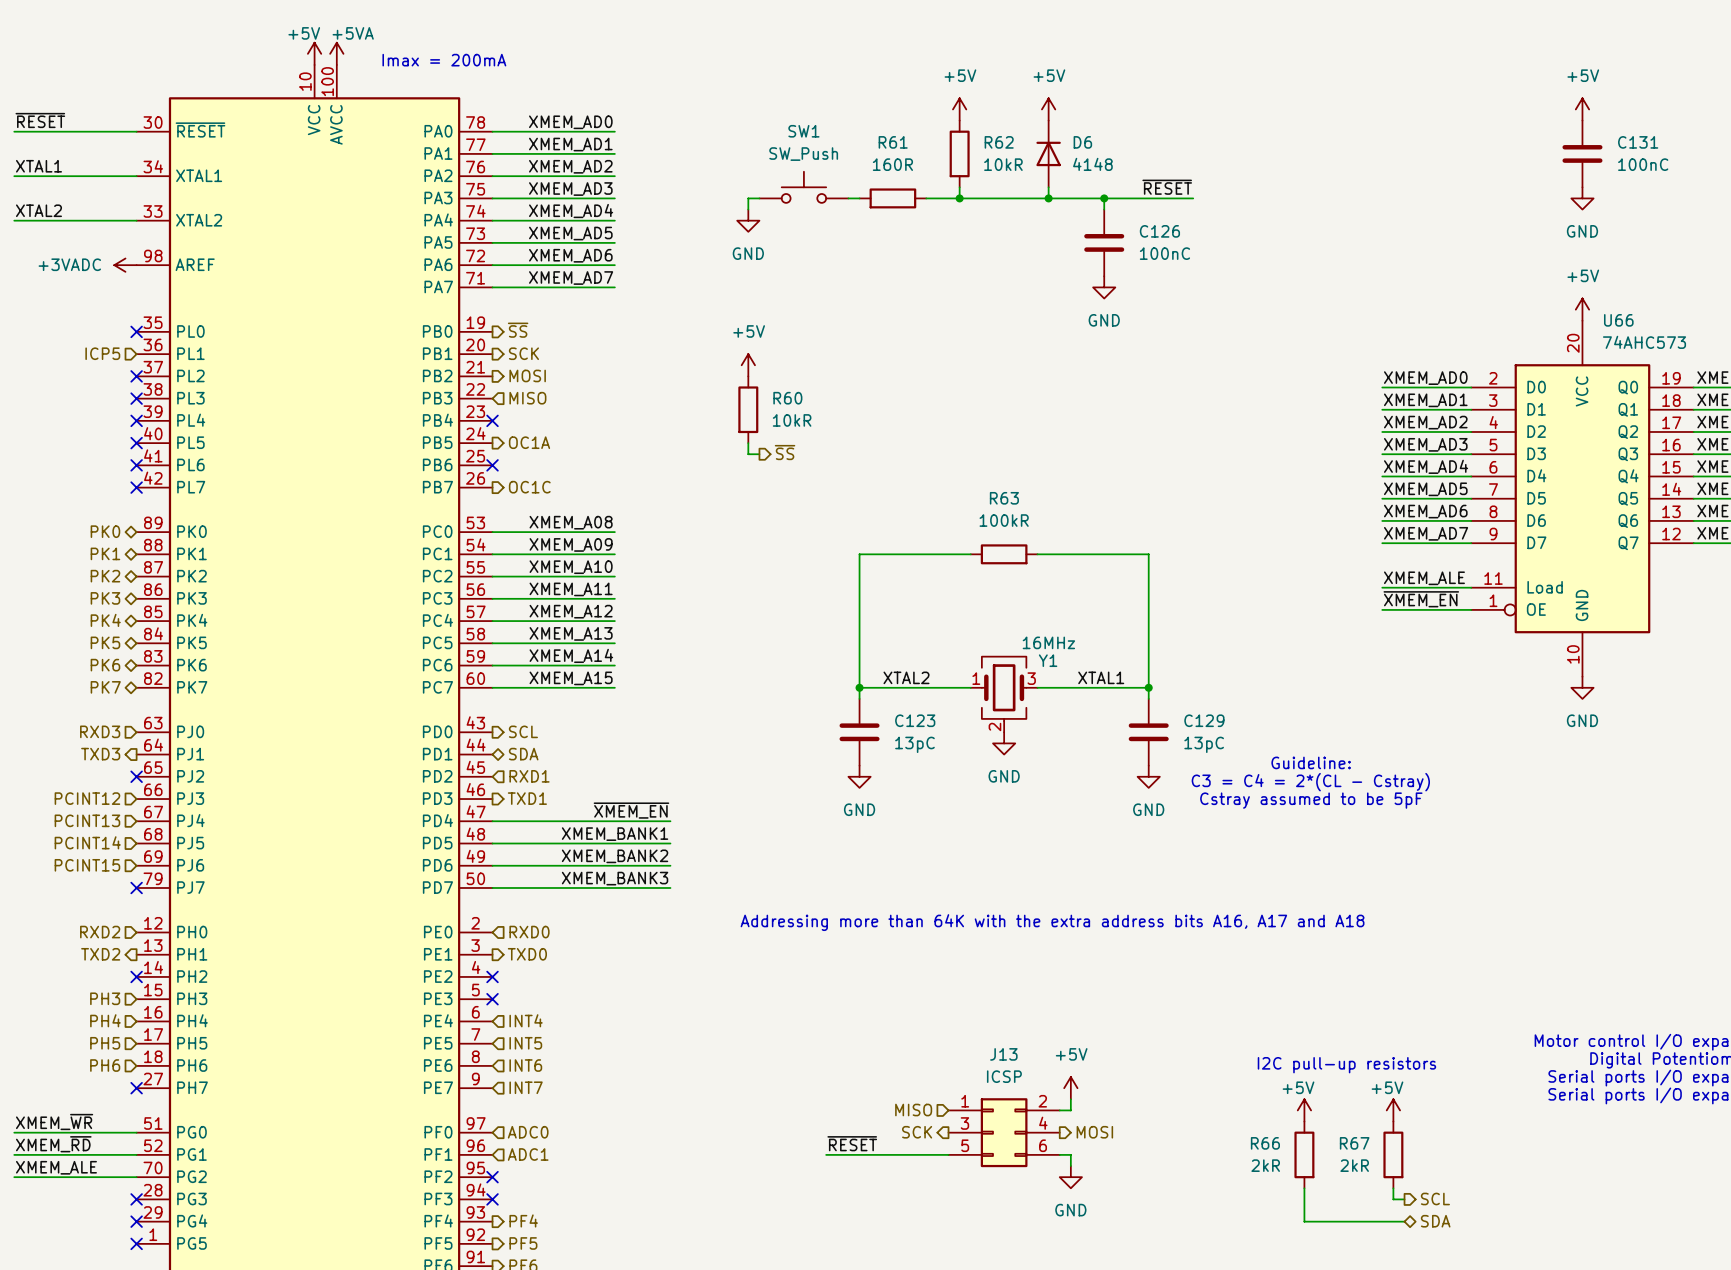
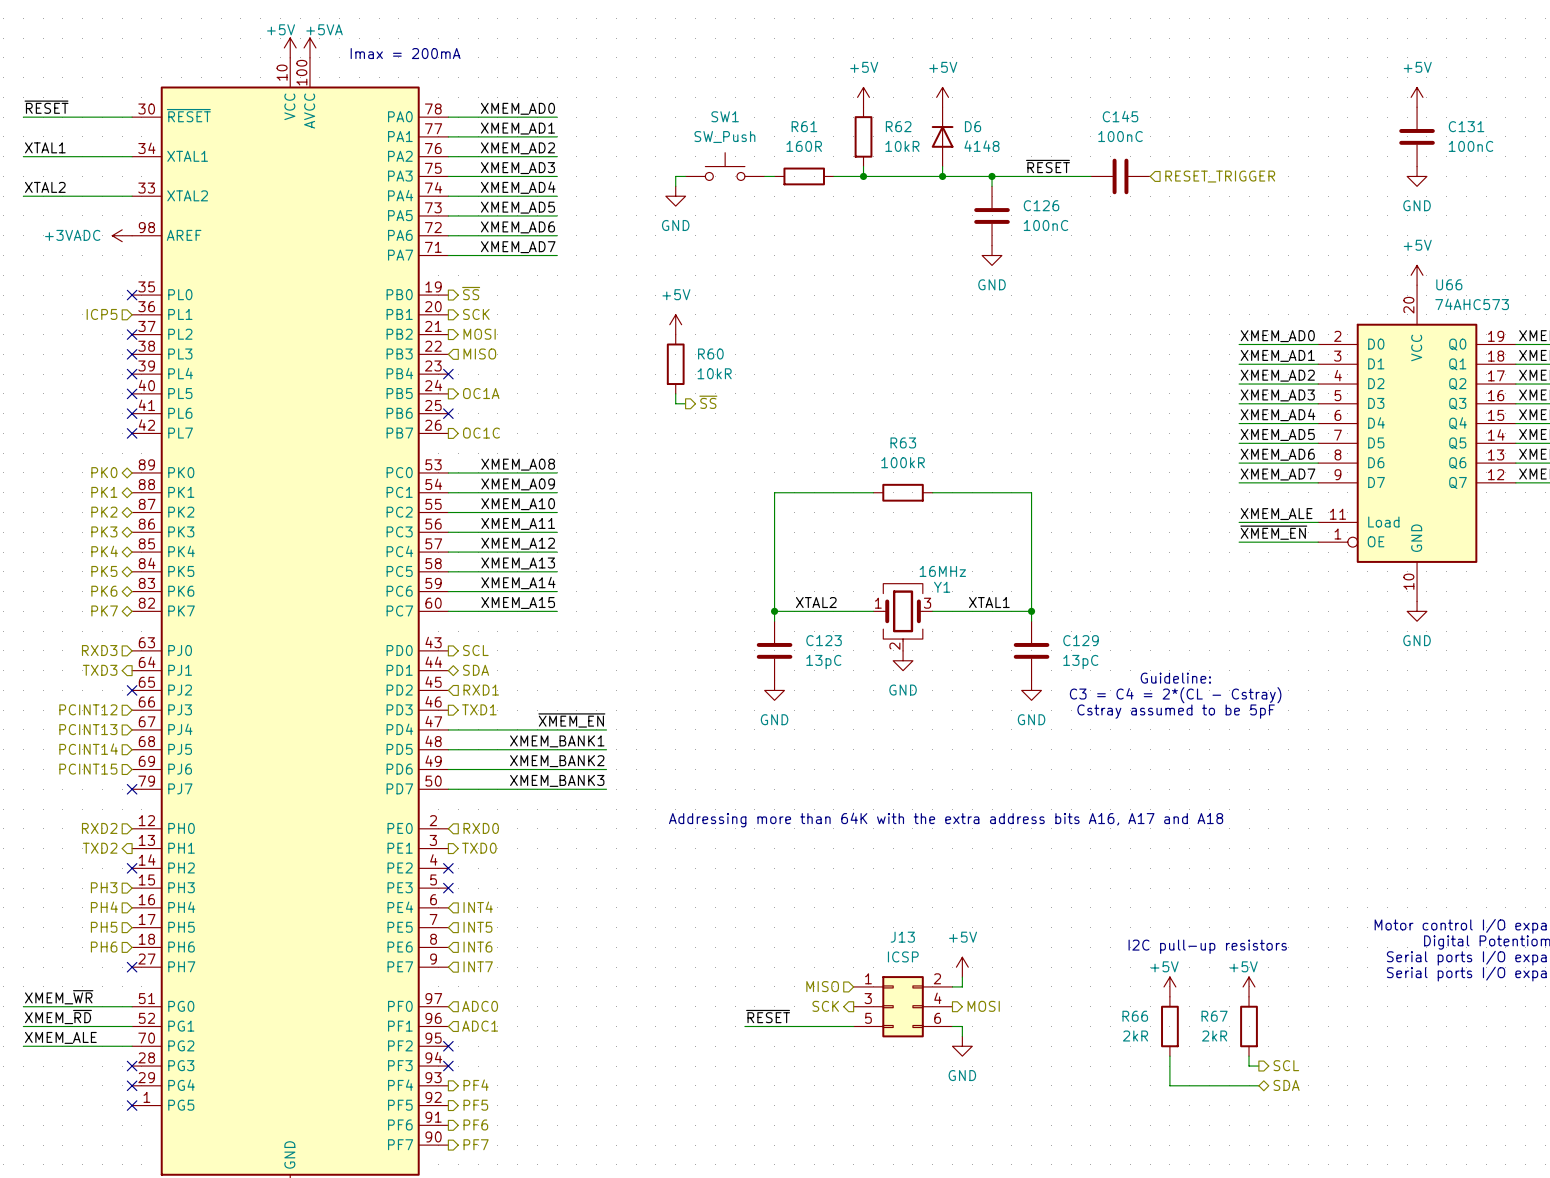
wire: none -> (1071, 176) (1090, 176)
C145: none -> 100nC (1120, 176)
hierarchical label: none -> RESET_TRIGGER (1220, 176)

